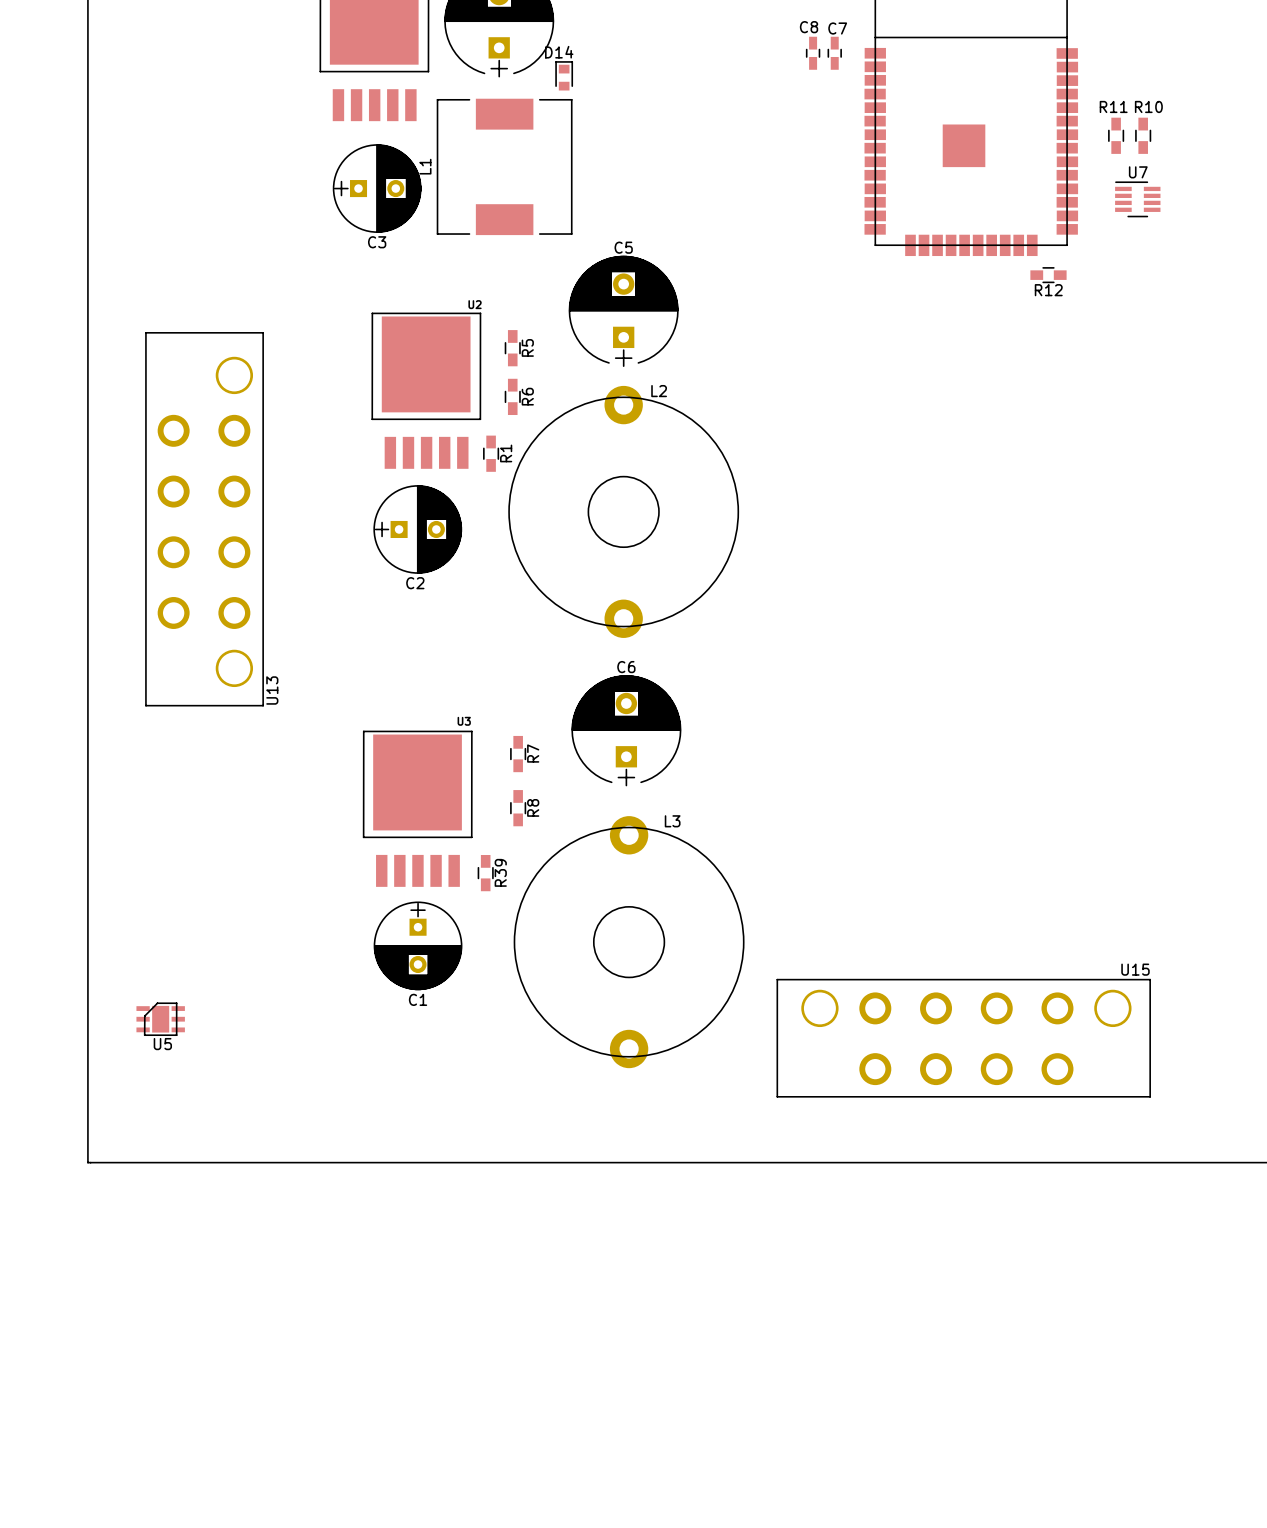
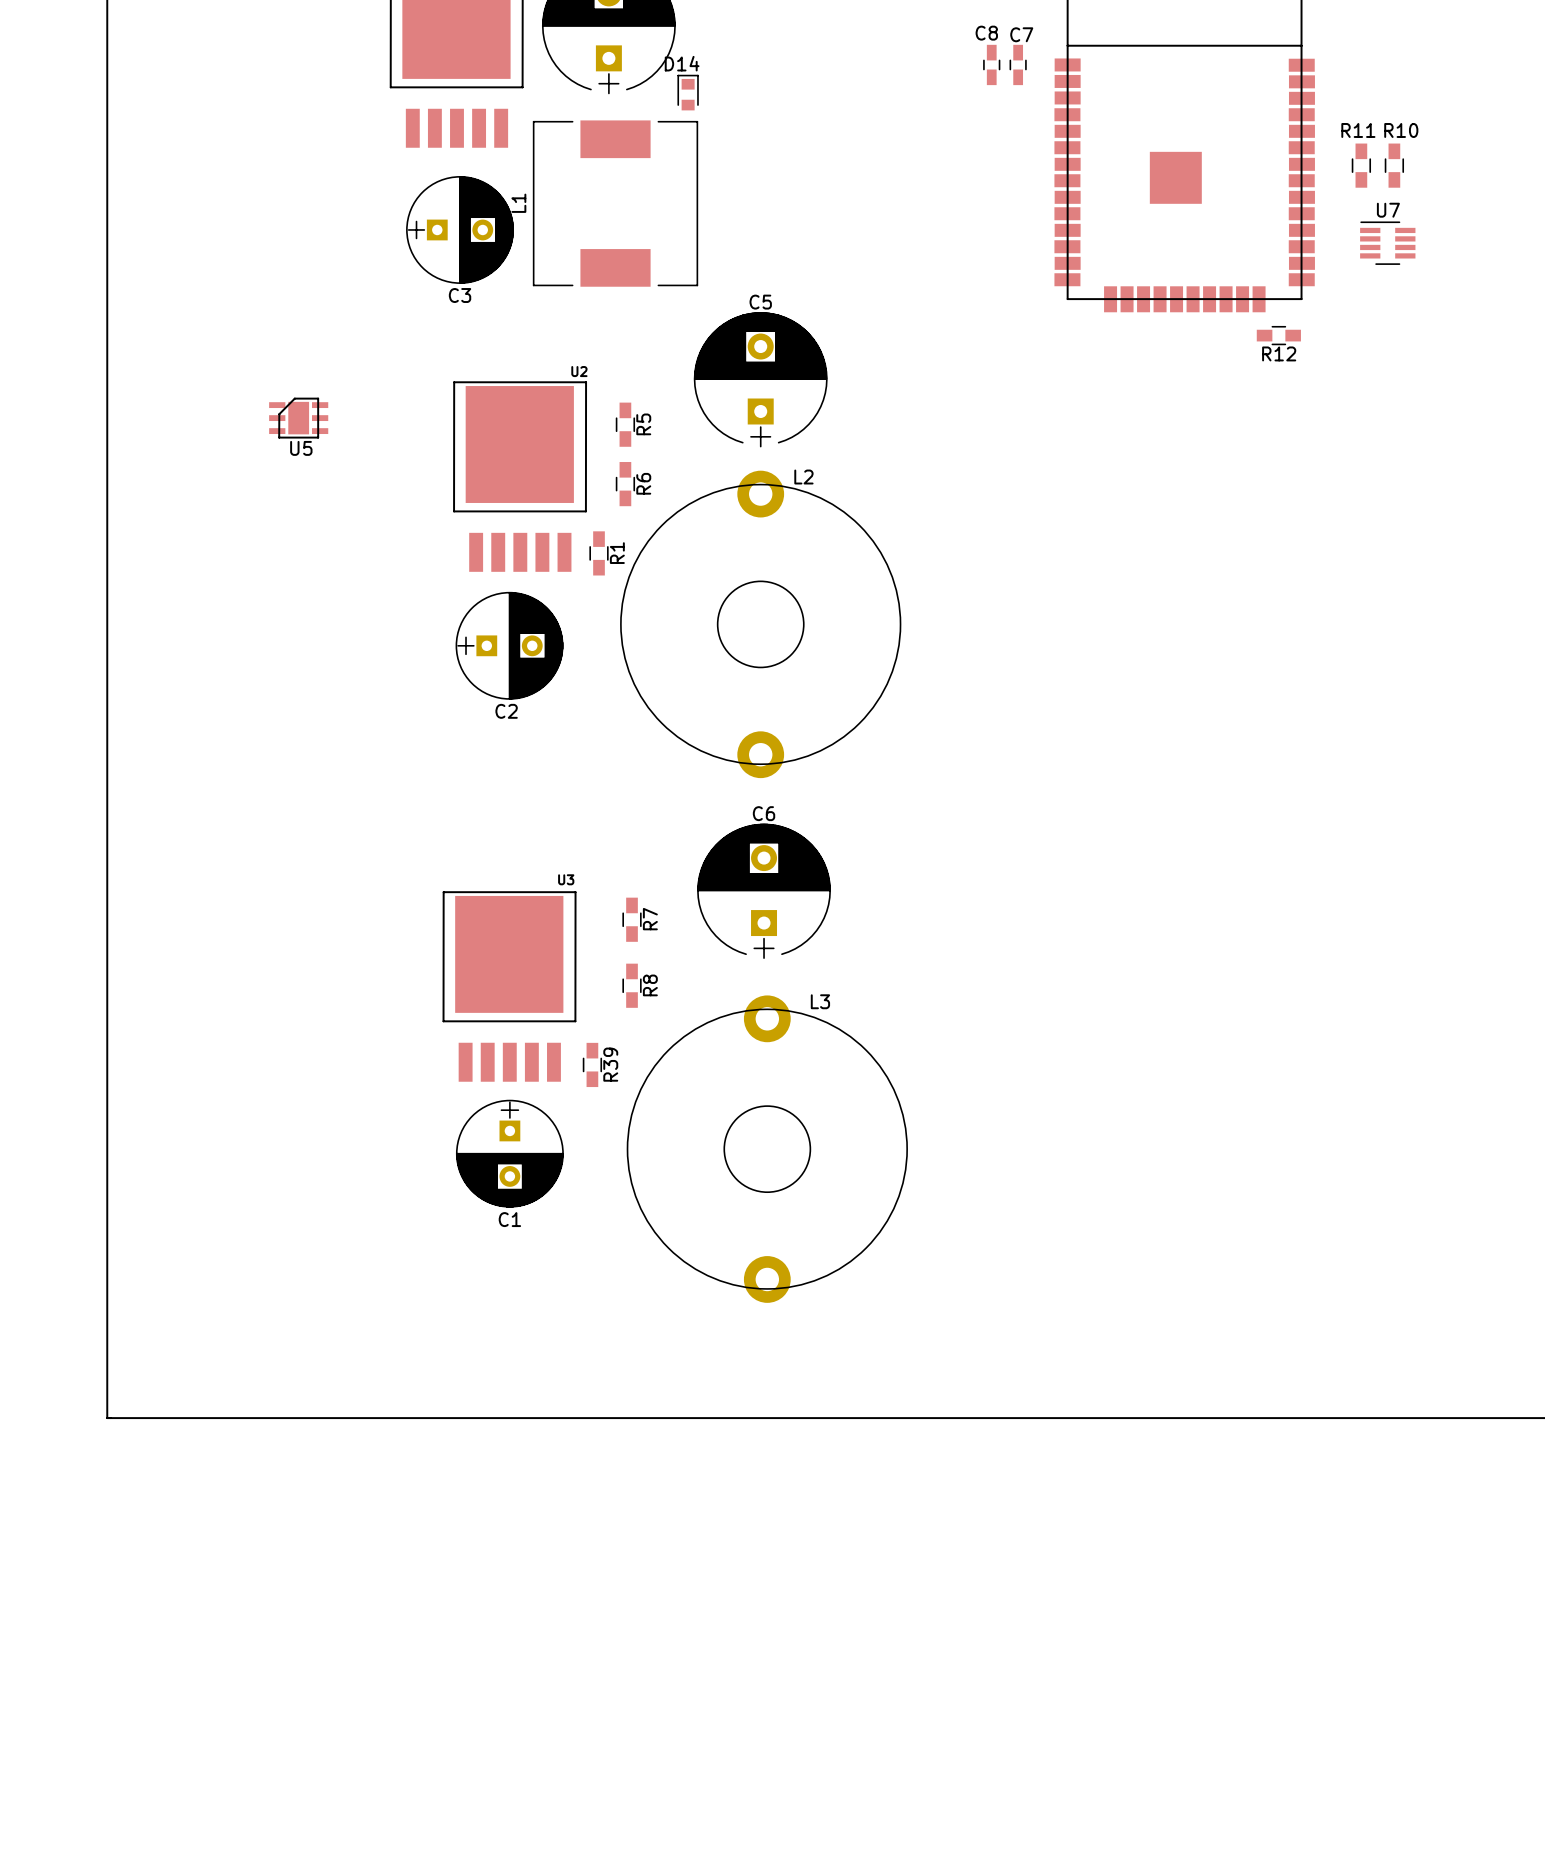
U13: (204, 519) -> none
U5 position: (160, 1019) -> (298, 418)
U15: (963, 1038) -> none

